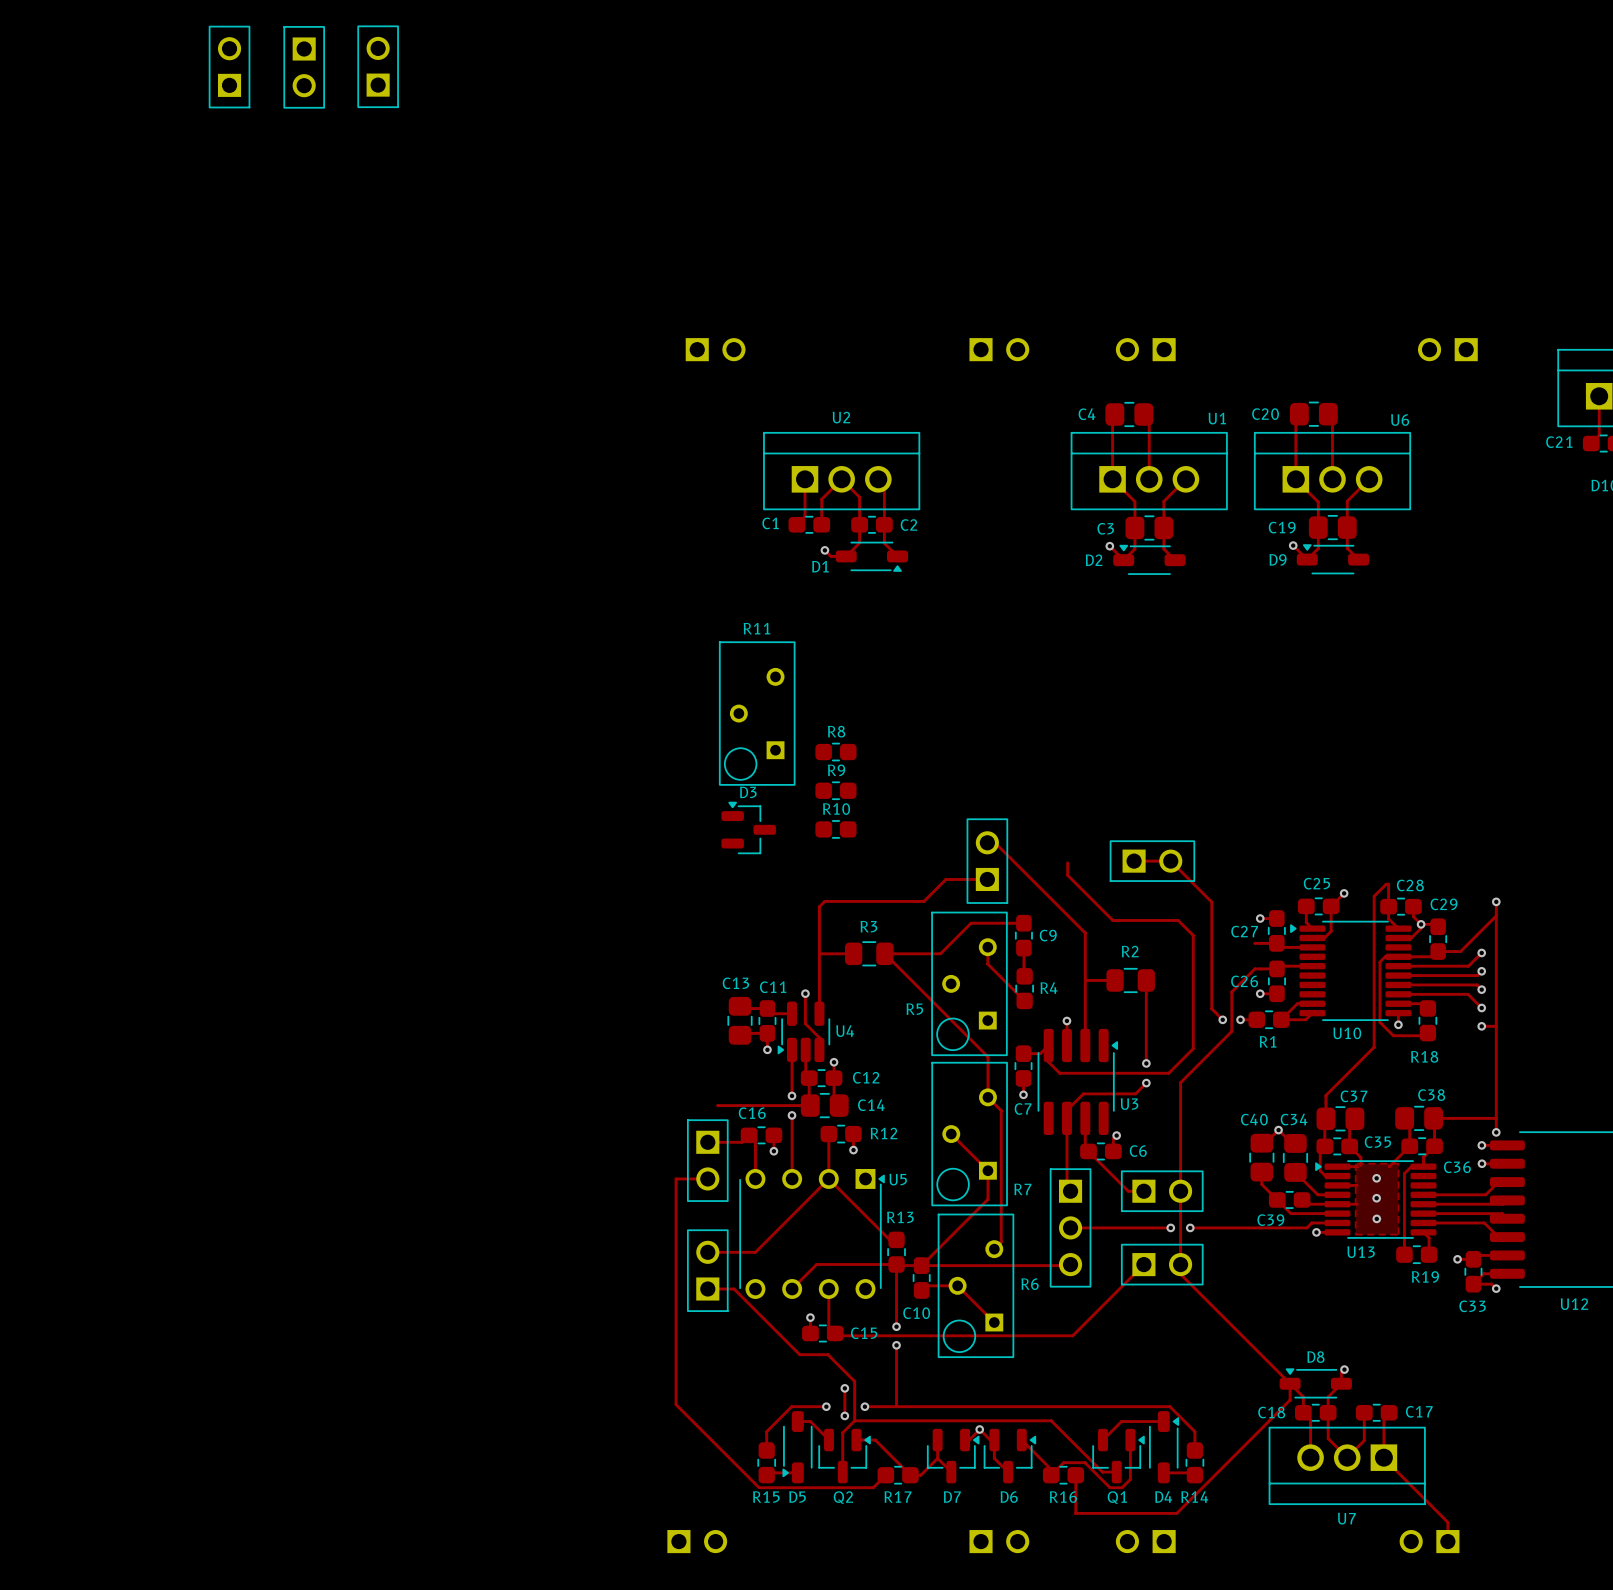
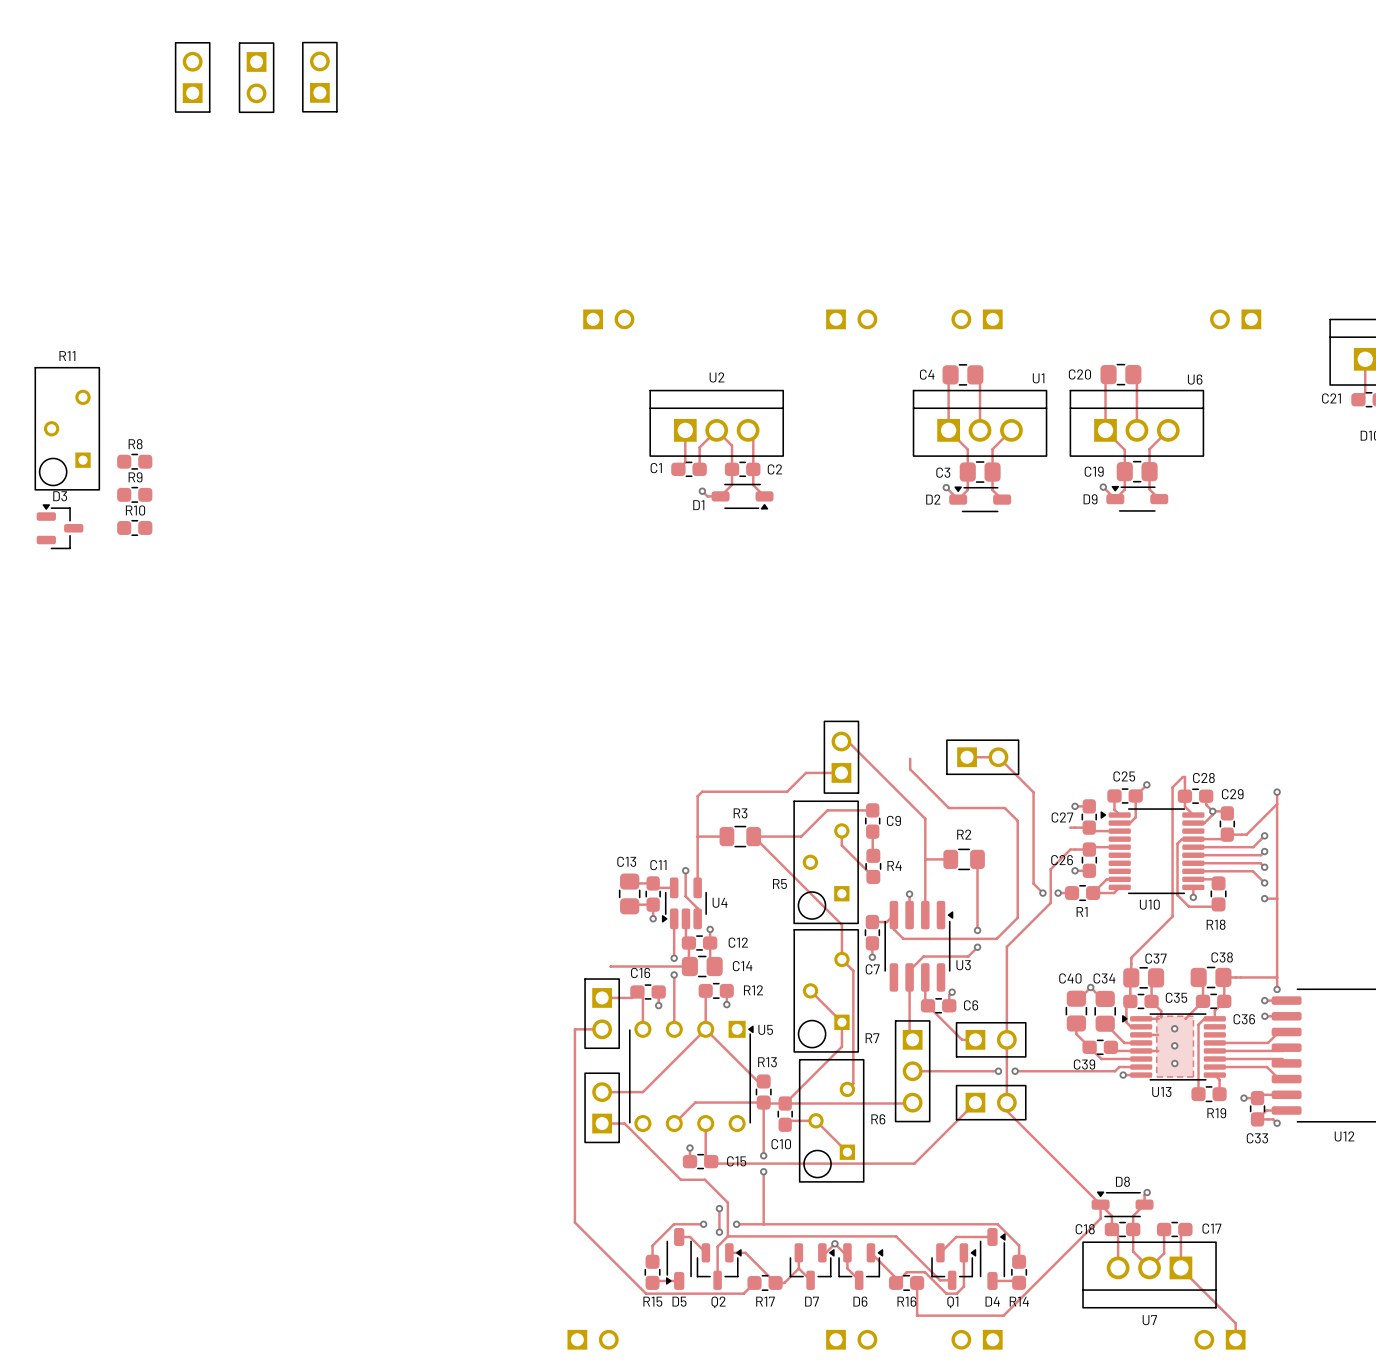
R11 position: (757, 713) -> (67, 428)
R8 position: (835, 752) -> (134, 461)
R9 position: (835, 790) -> (134, 494)
D3 position: (748, 827) -> (60, 526)
R10 position: (835, 829) -> (134, 527)

